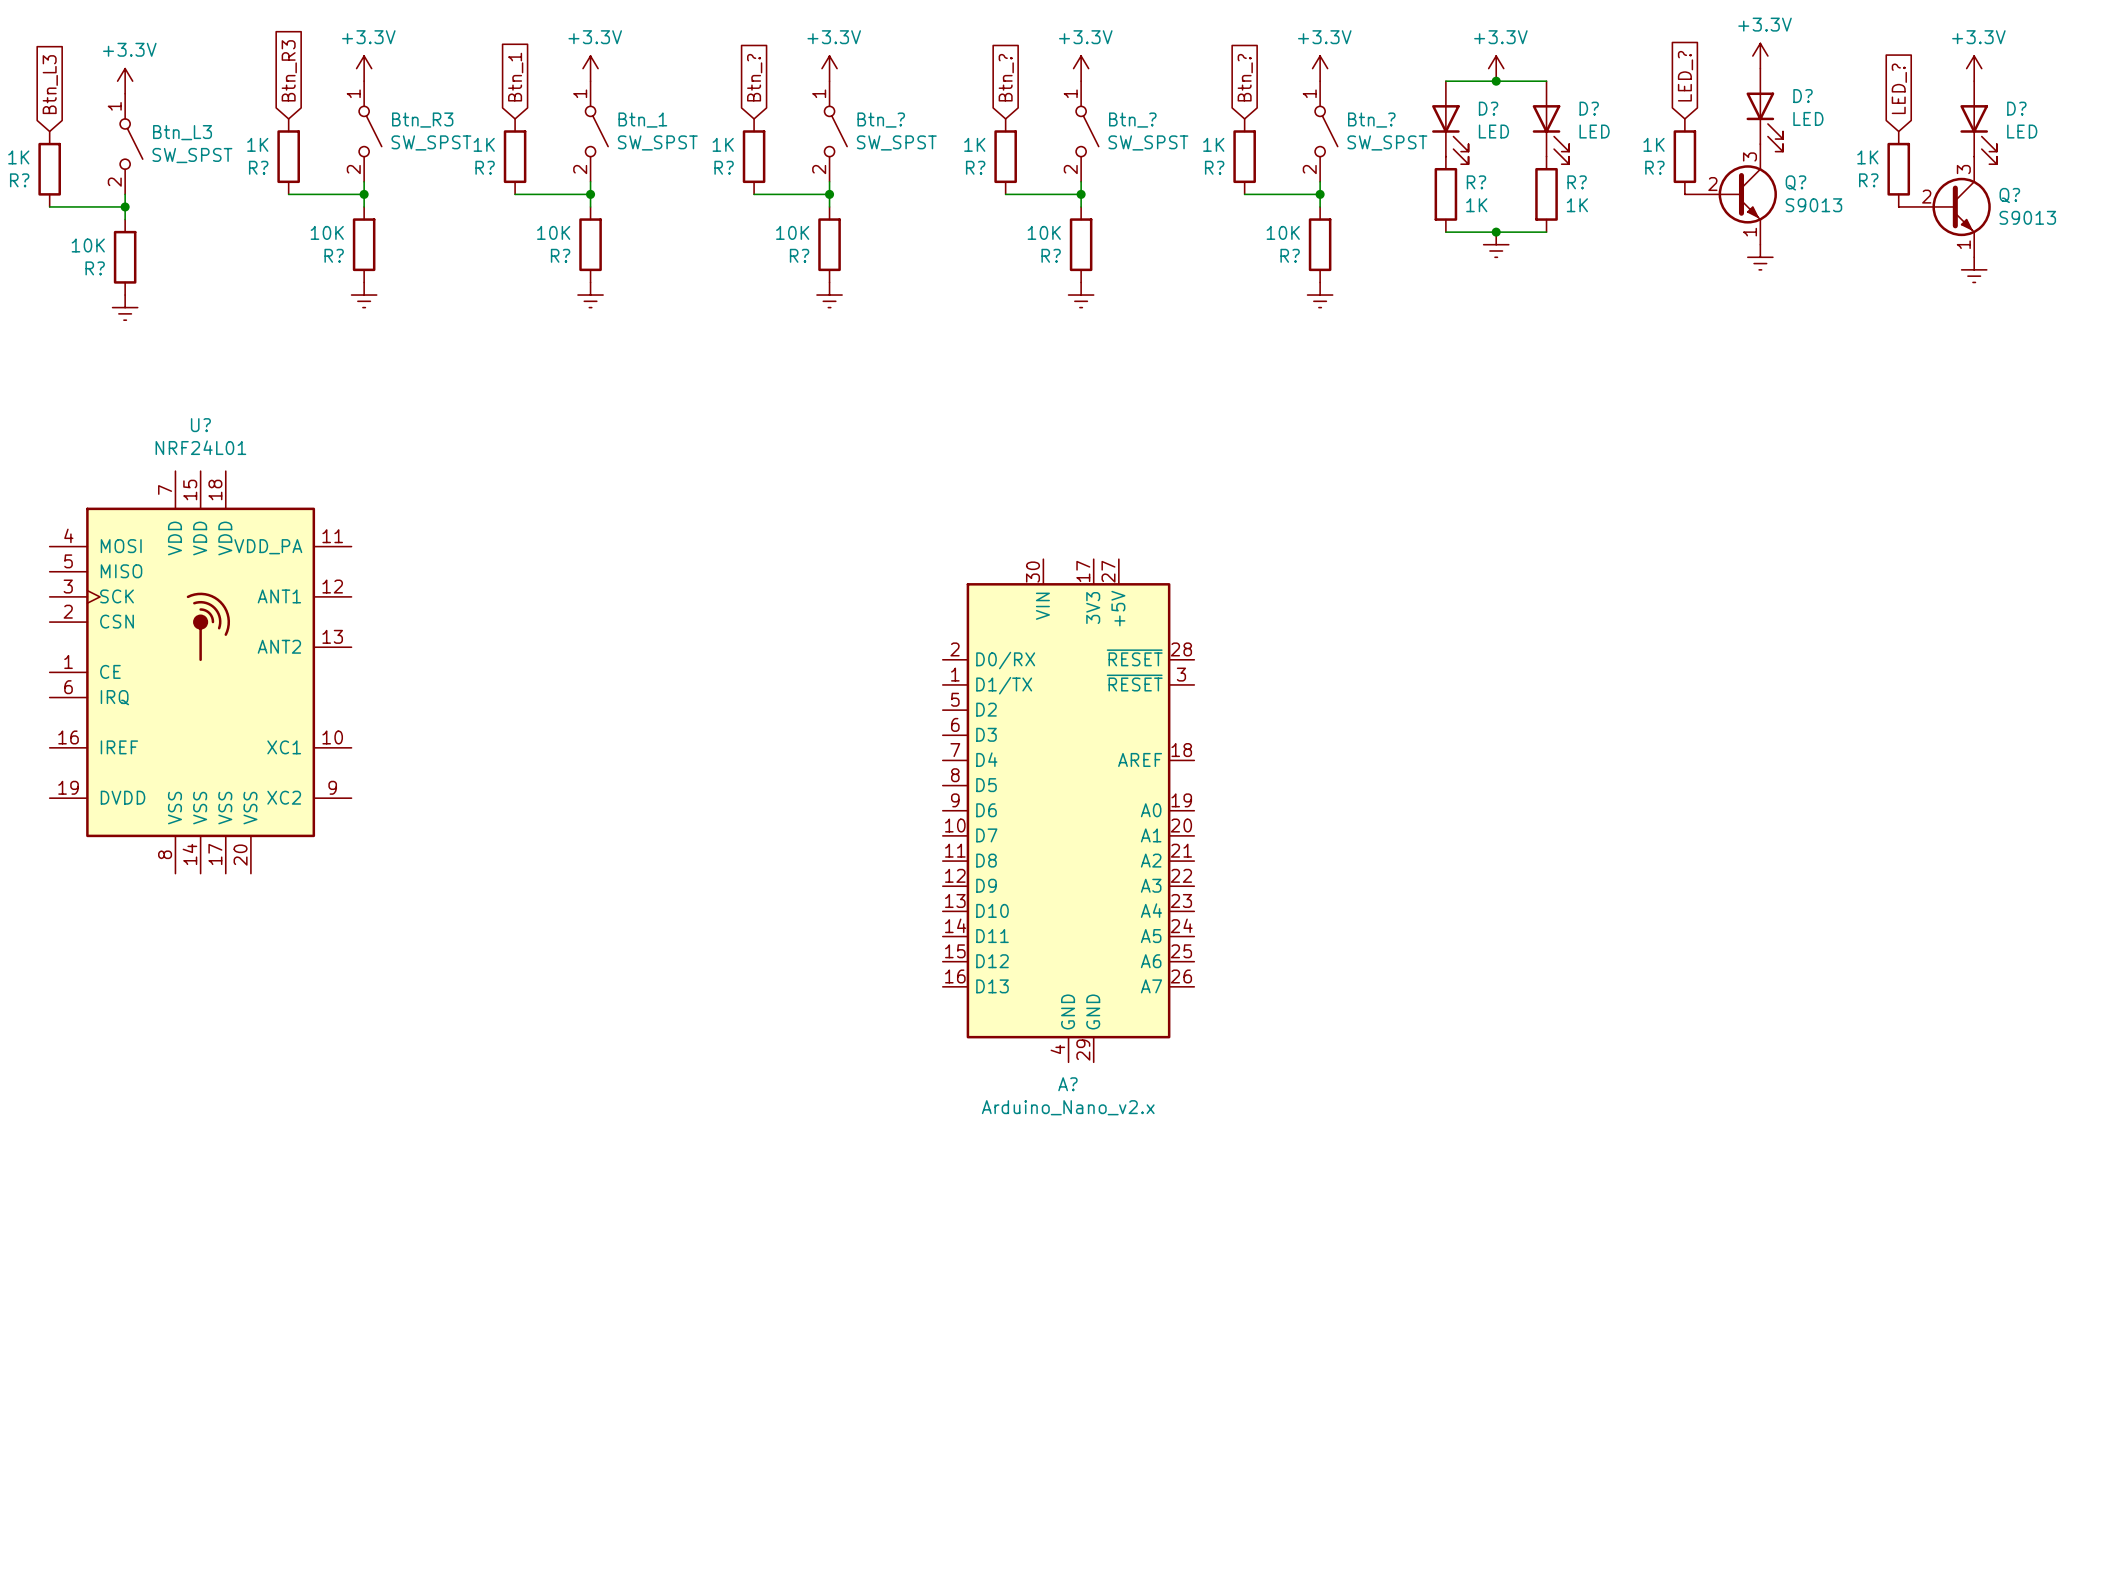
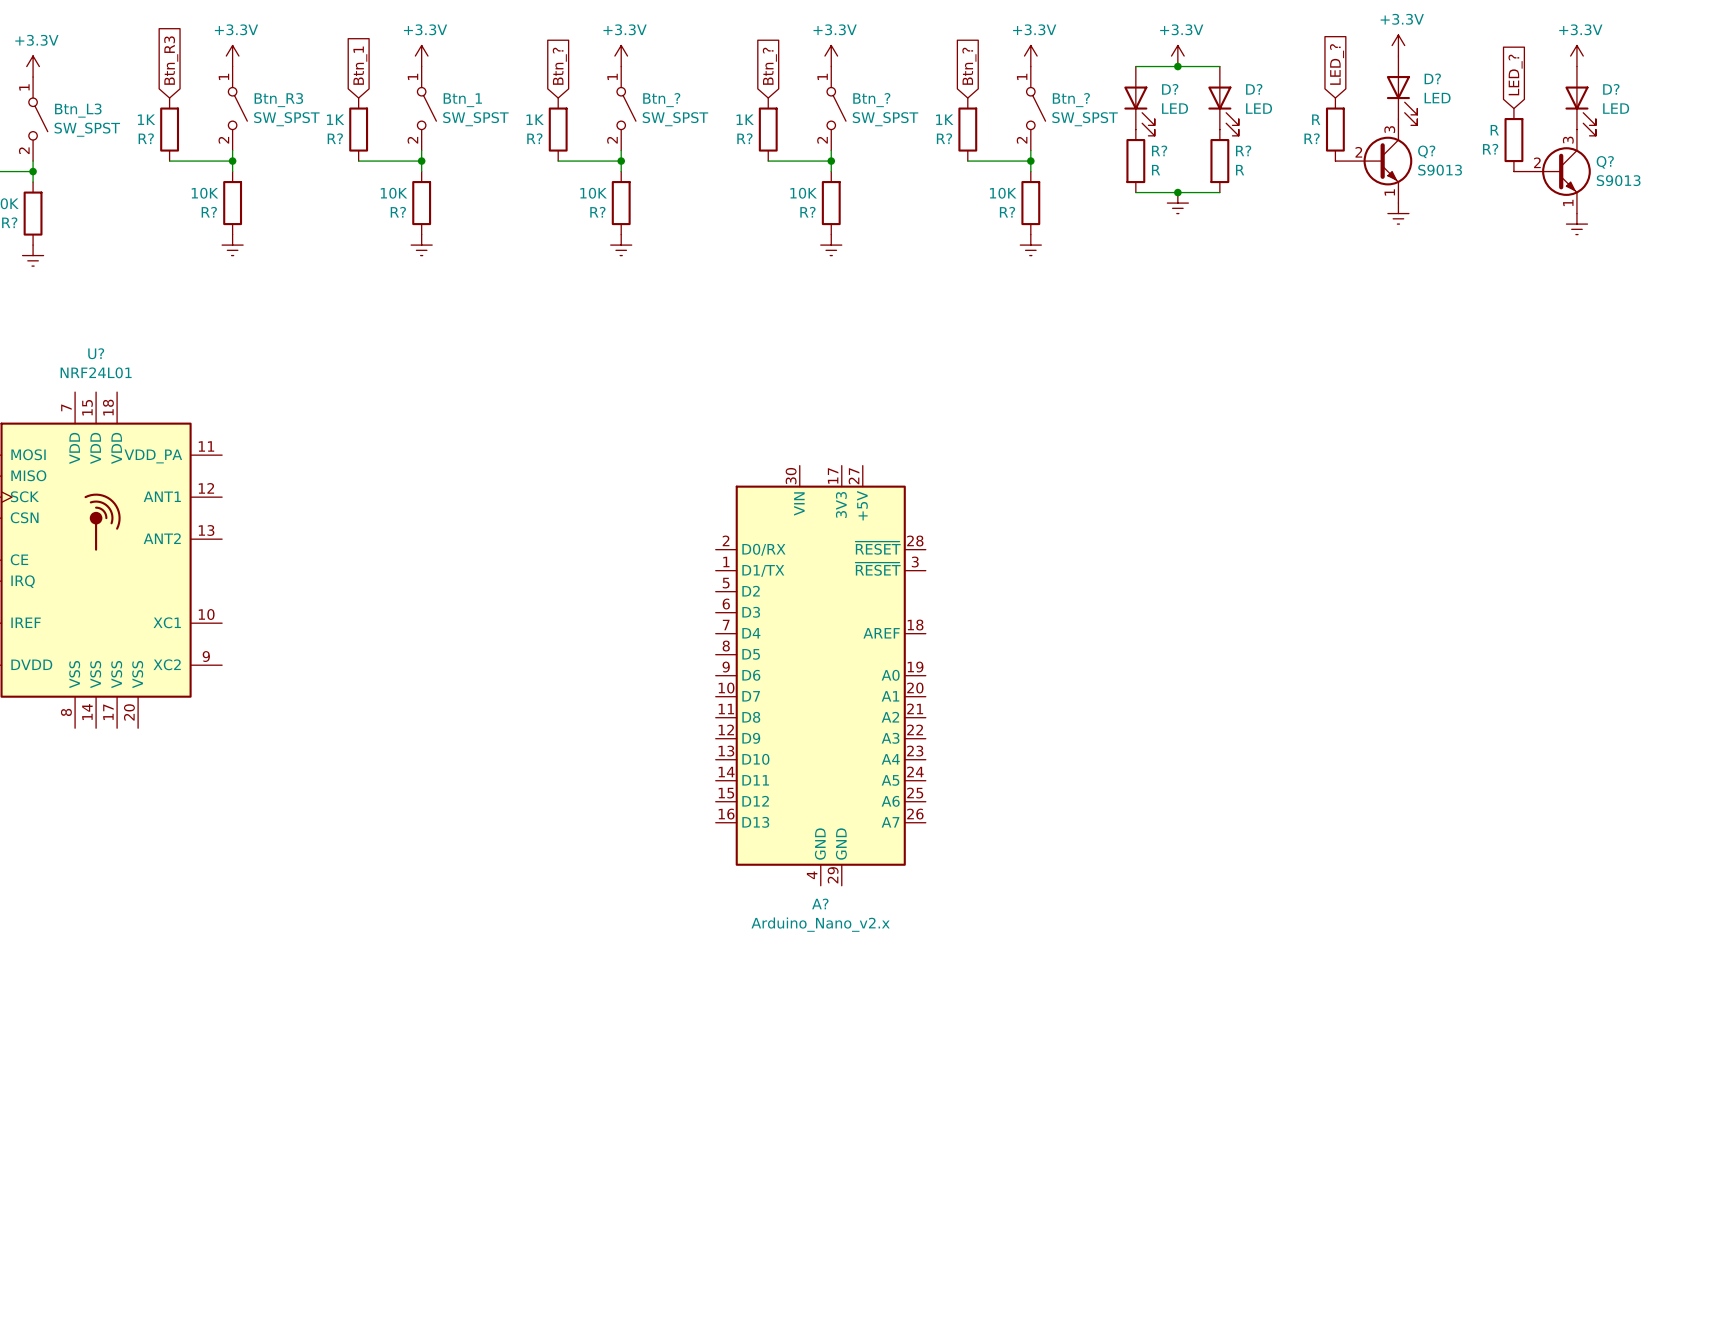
R? value: 1K (1654, 144) -> R (1316, 119)
R? value: 1K (1867, 157) -> R (1494, 130)
R? value: 1K (1476, 205) -> R (1156, 170)
R? value: 1K (1577, 205) -> R (1240, 170)

